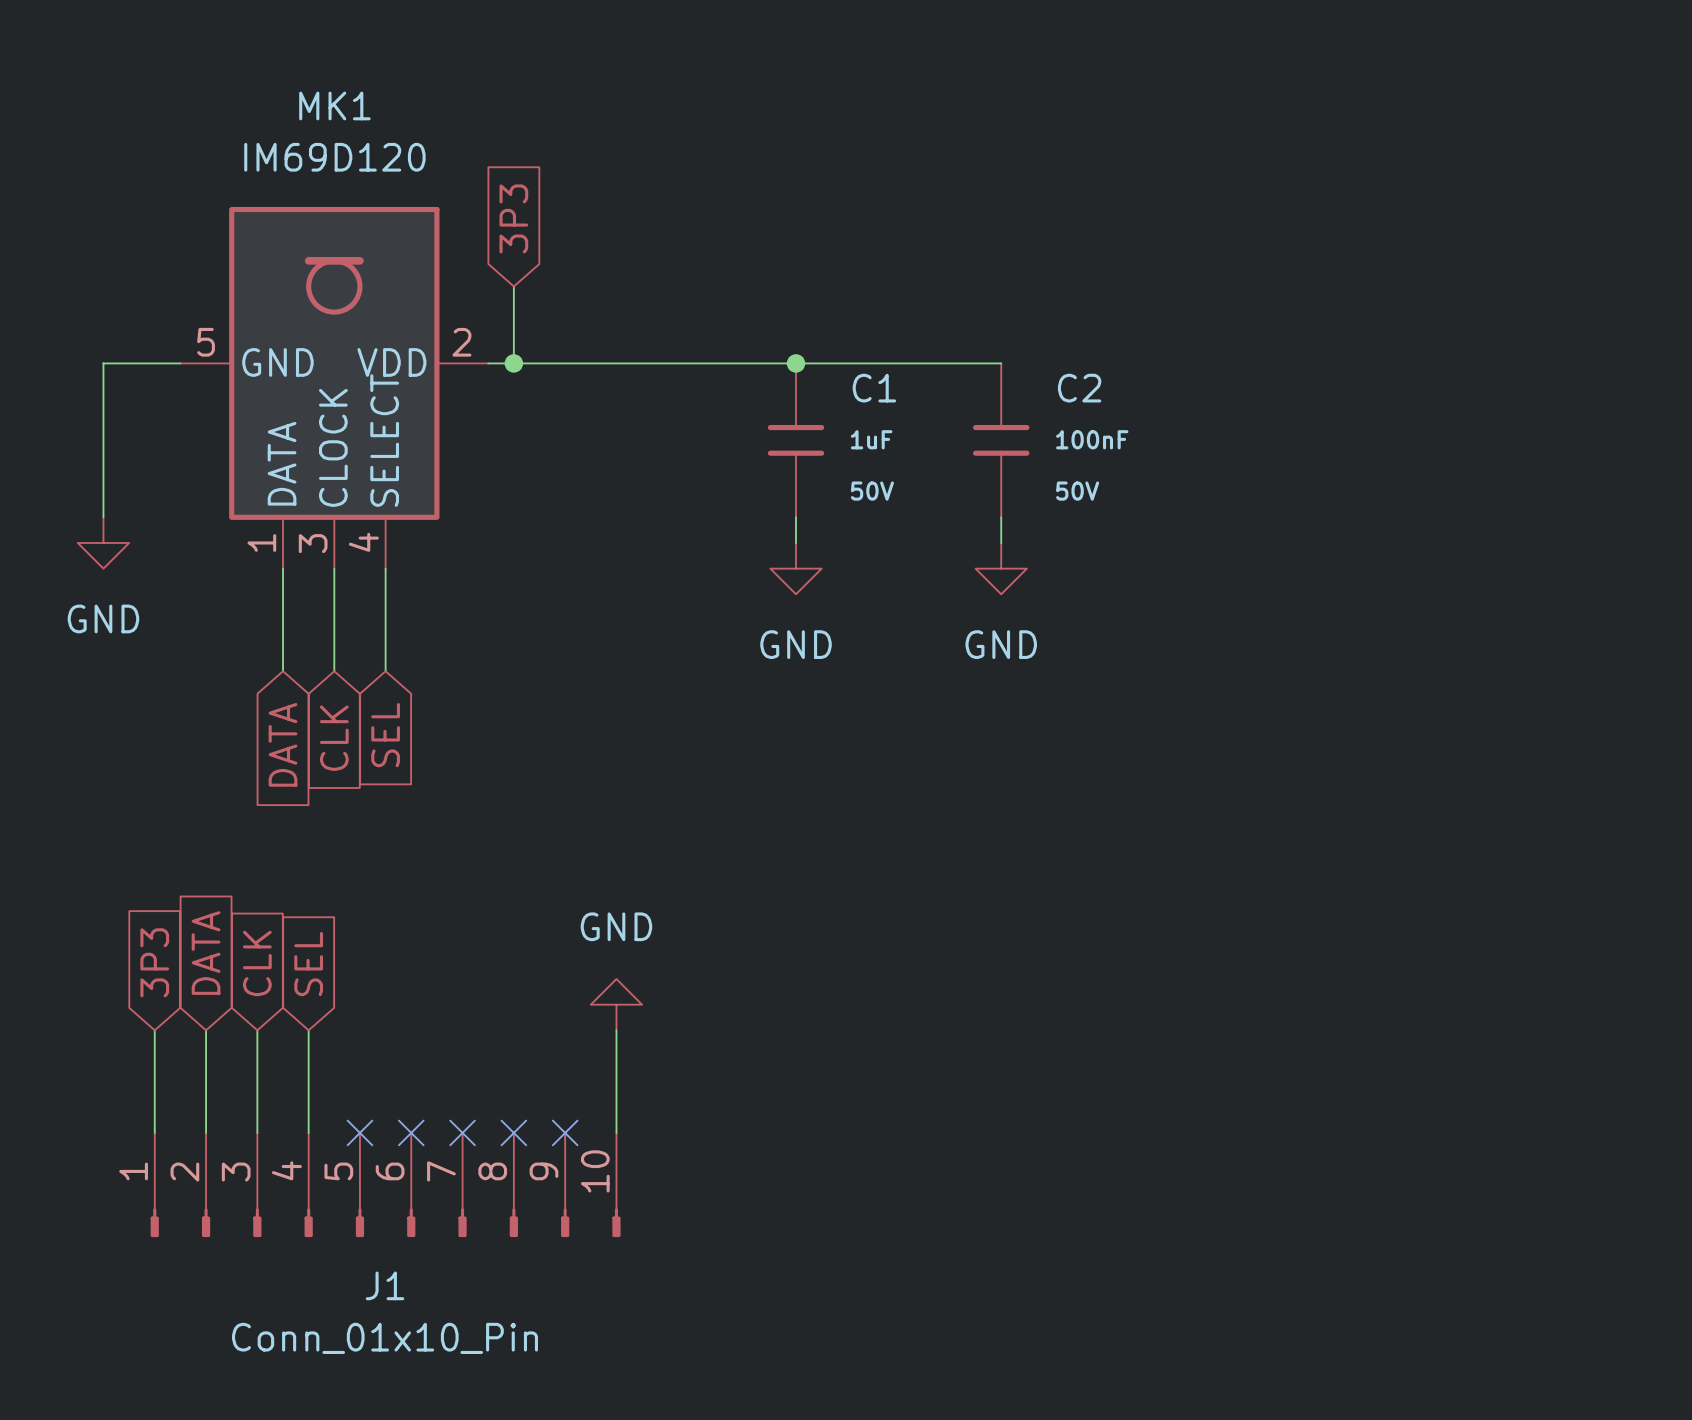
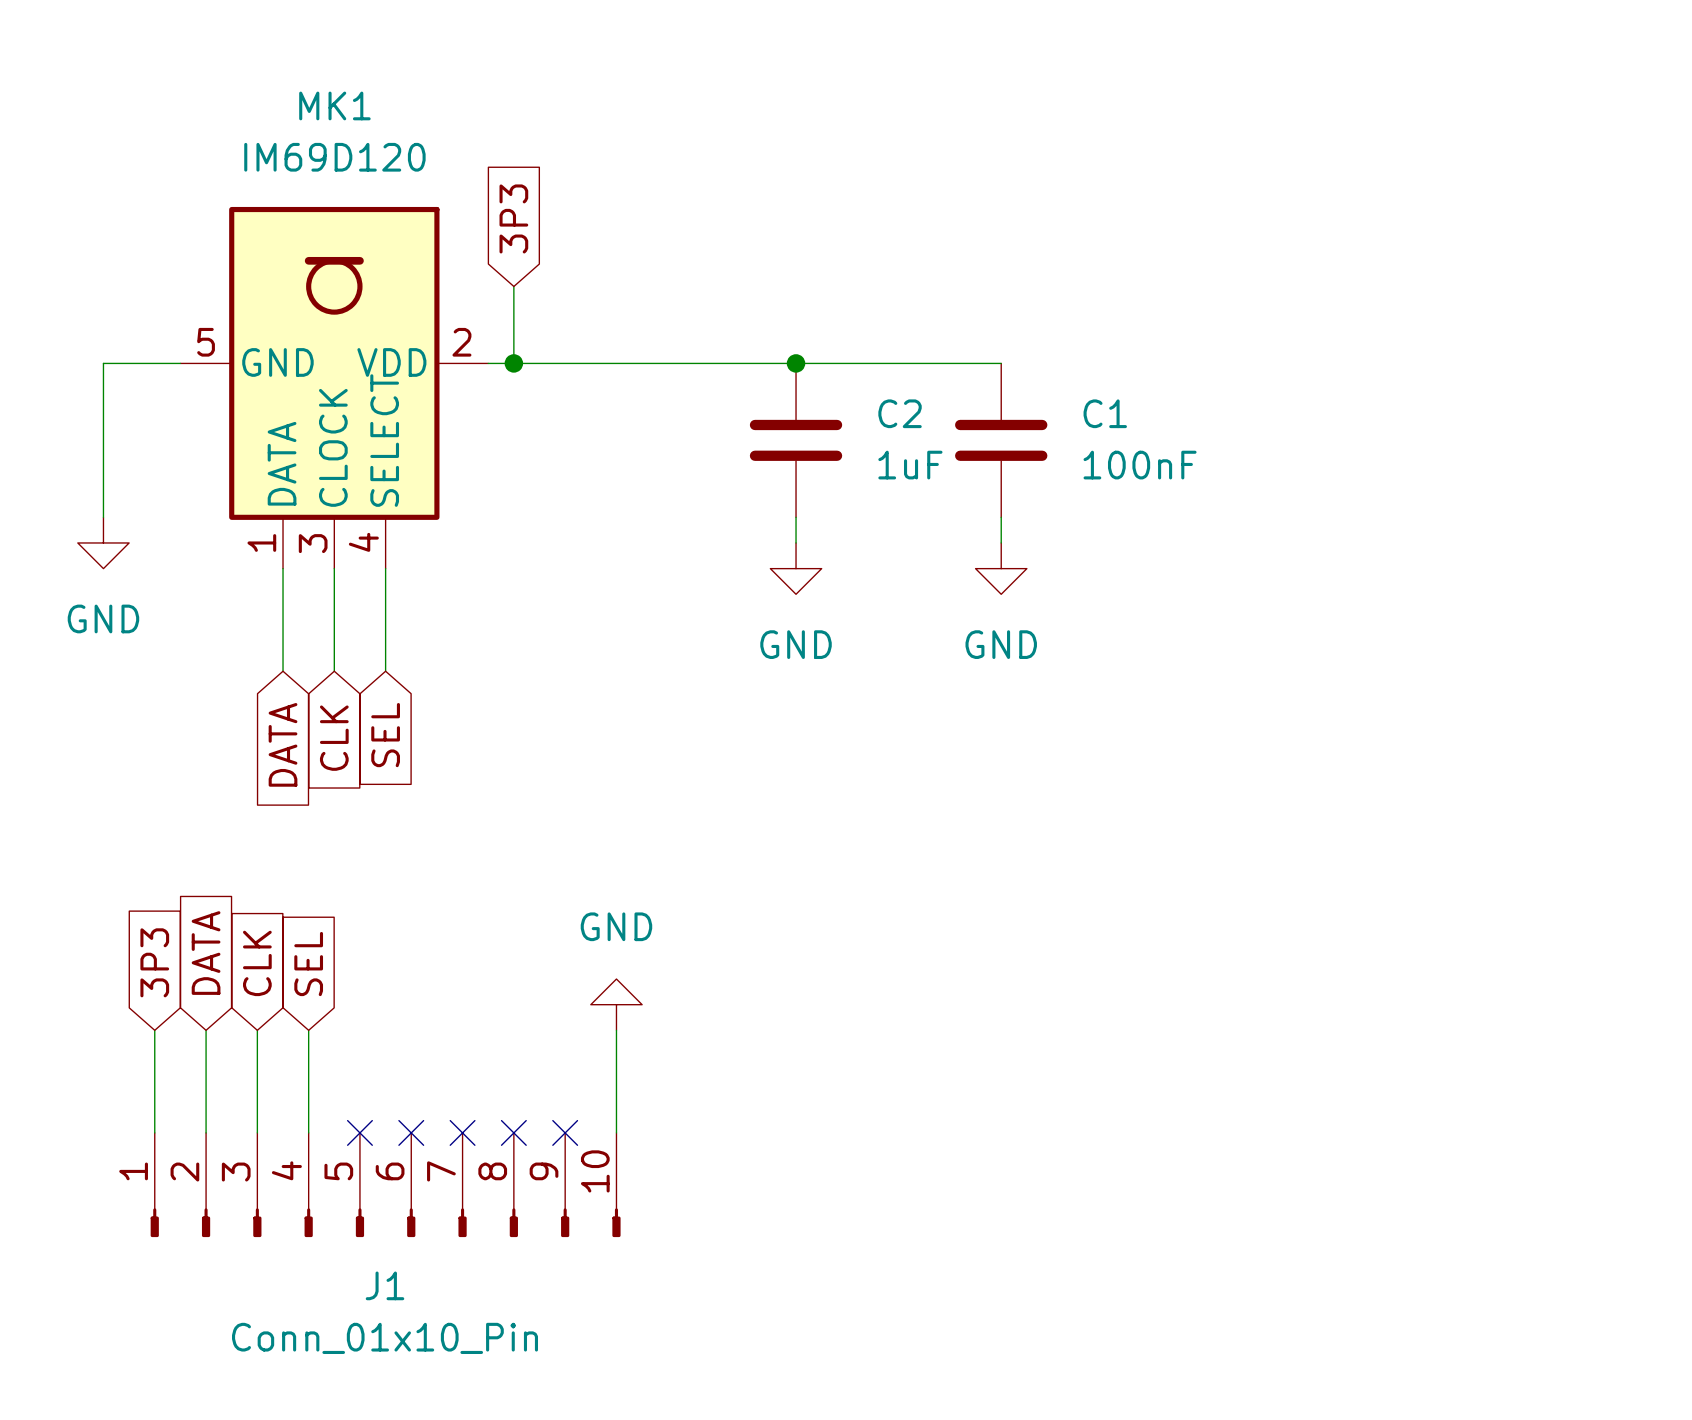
C1 symbol: [767, 363, 825, 518] -> [955, 363, 1048, 518]
C2 symbol: [973, 363, 1030, 518] -> [749, 363, 843, 518]
C1 value: 1uF (871, 439) -> 100nF (1140, 465)
C2 value: 100nF (1092, 439) -> 1uF (910, 465)
C1 text: 50V (872, 491) -> none
C2 text: 50V (1077, 491) -> none

